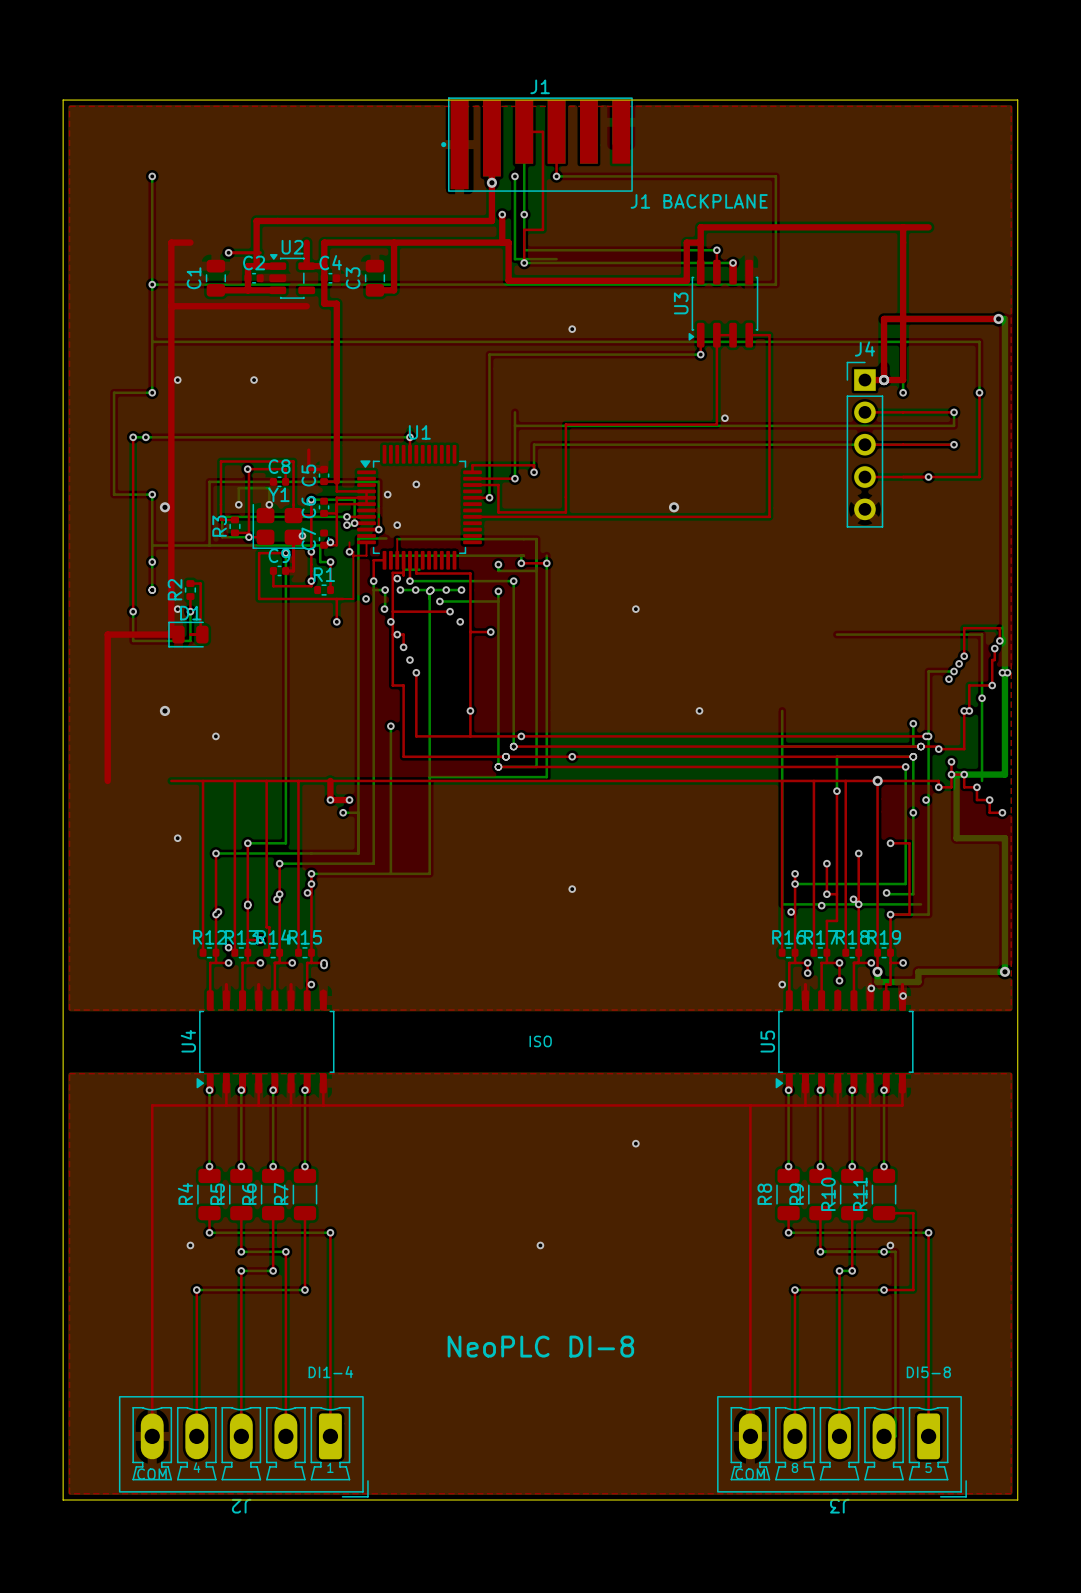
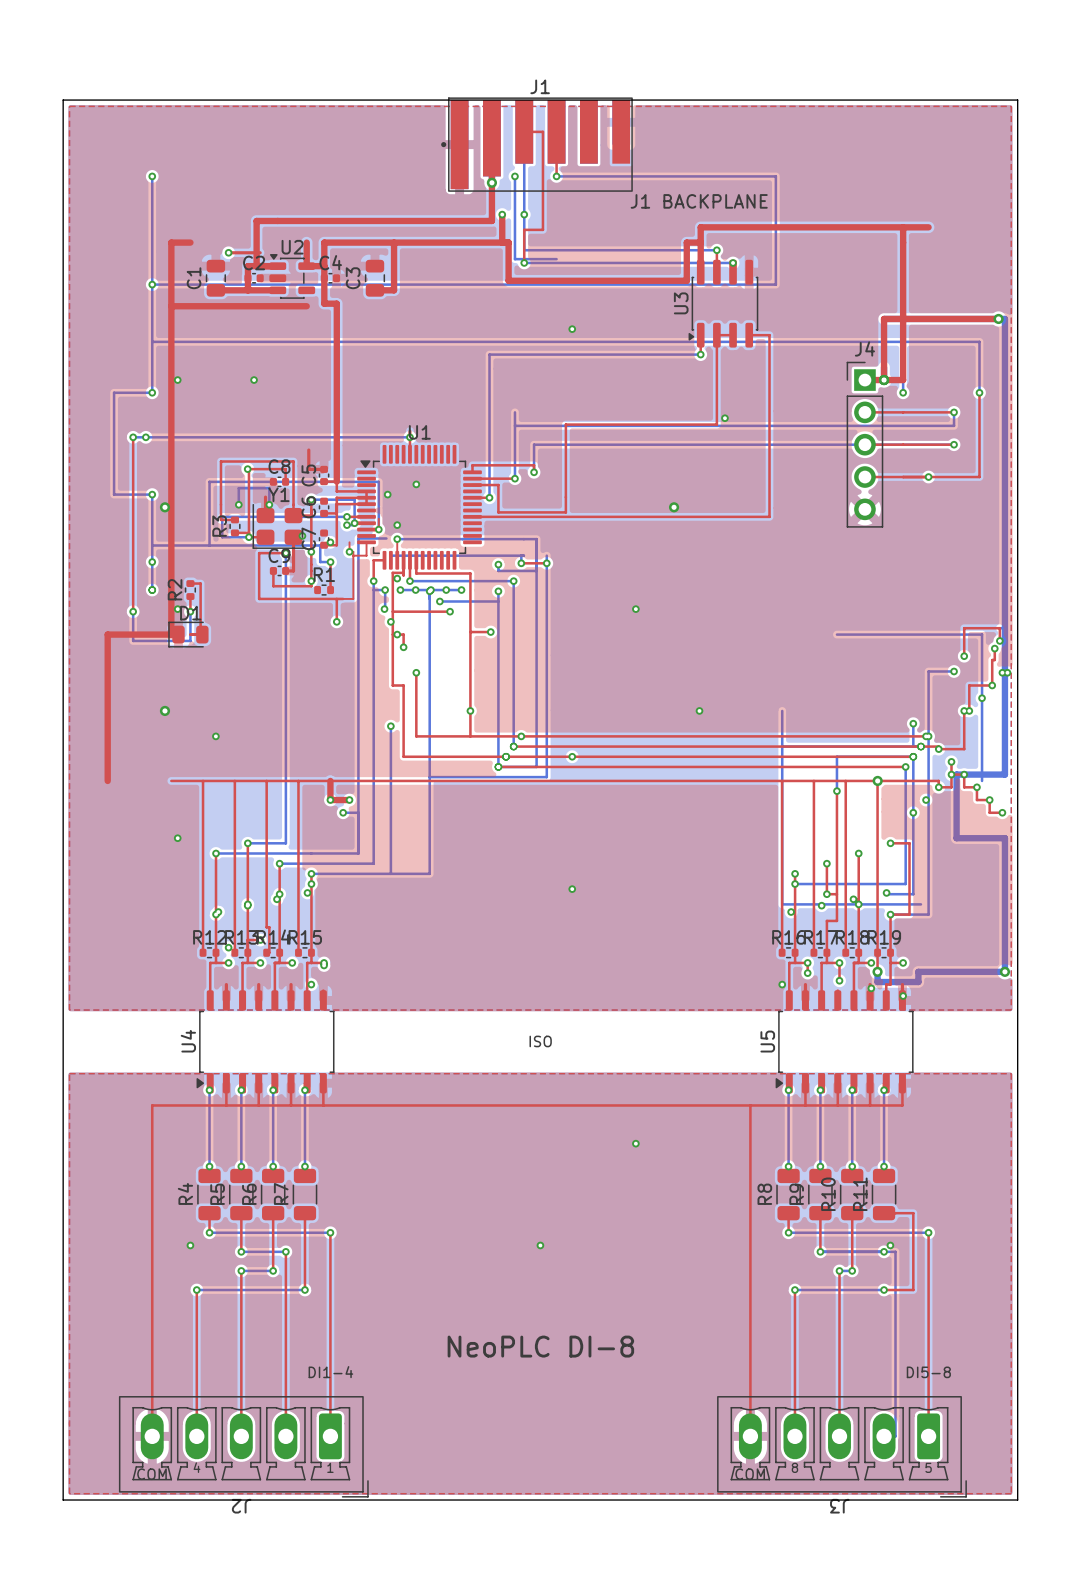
top track: none -> (265, 497) (265, 515)
via: none -> (397, 539)
bottom track: (403, 569) (419, 569) -> none
via: (366, 598) -> none
via: (460, 621) -> none
via: (409, 660) -> none
via: (959, 663) -> none
via: (948, 679) -> none

